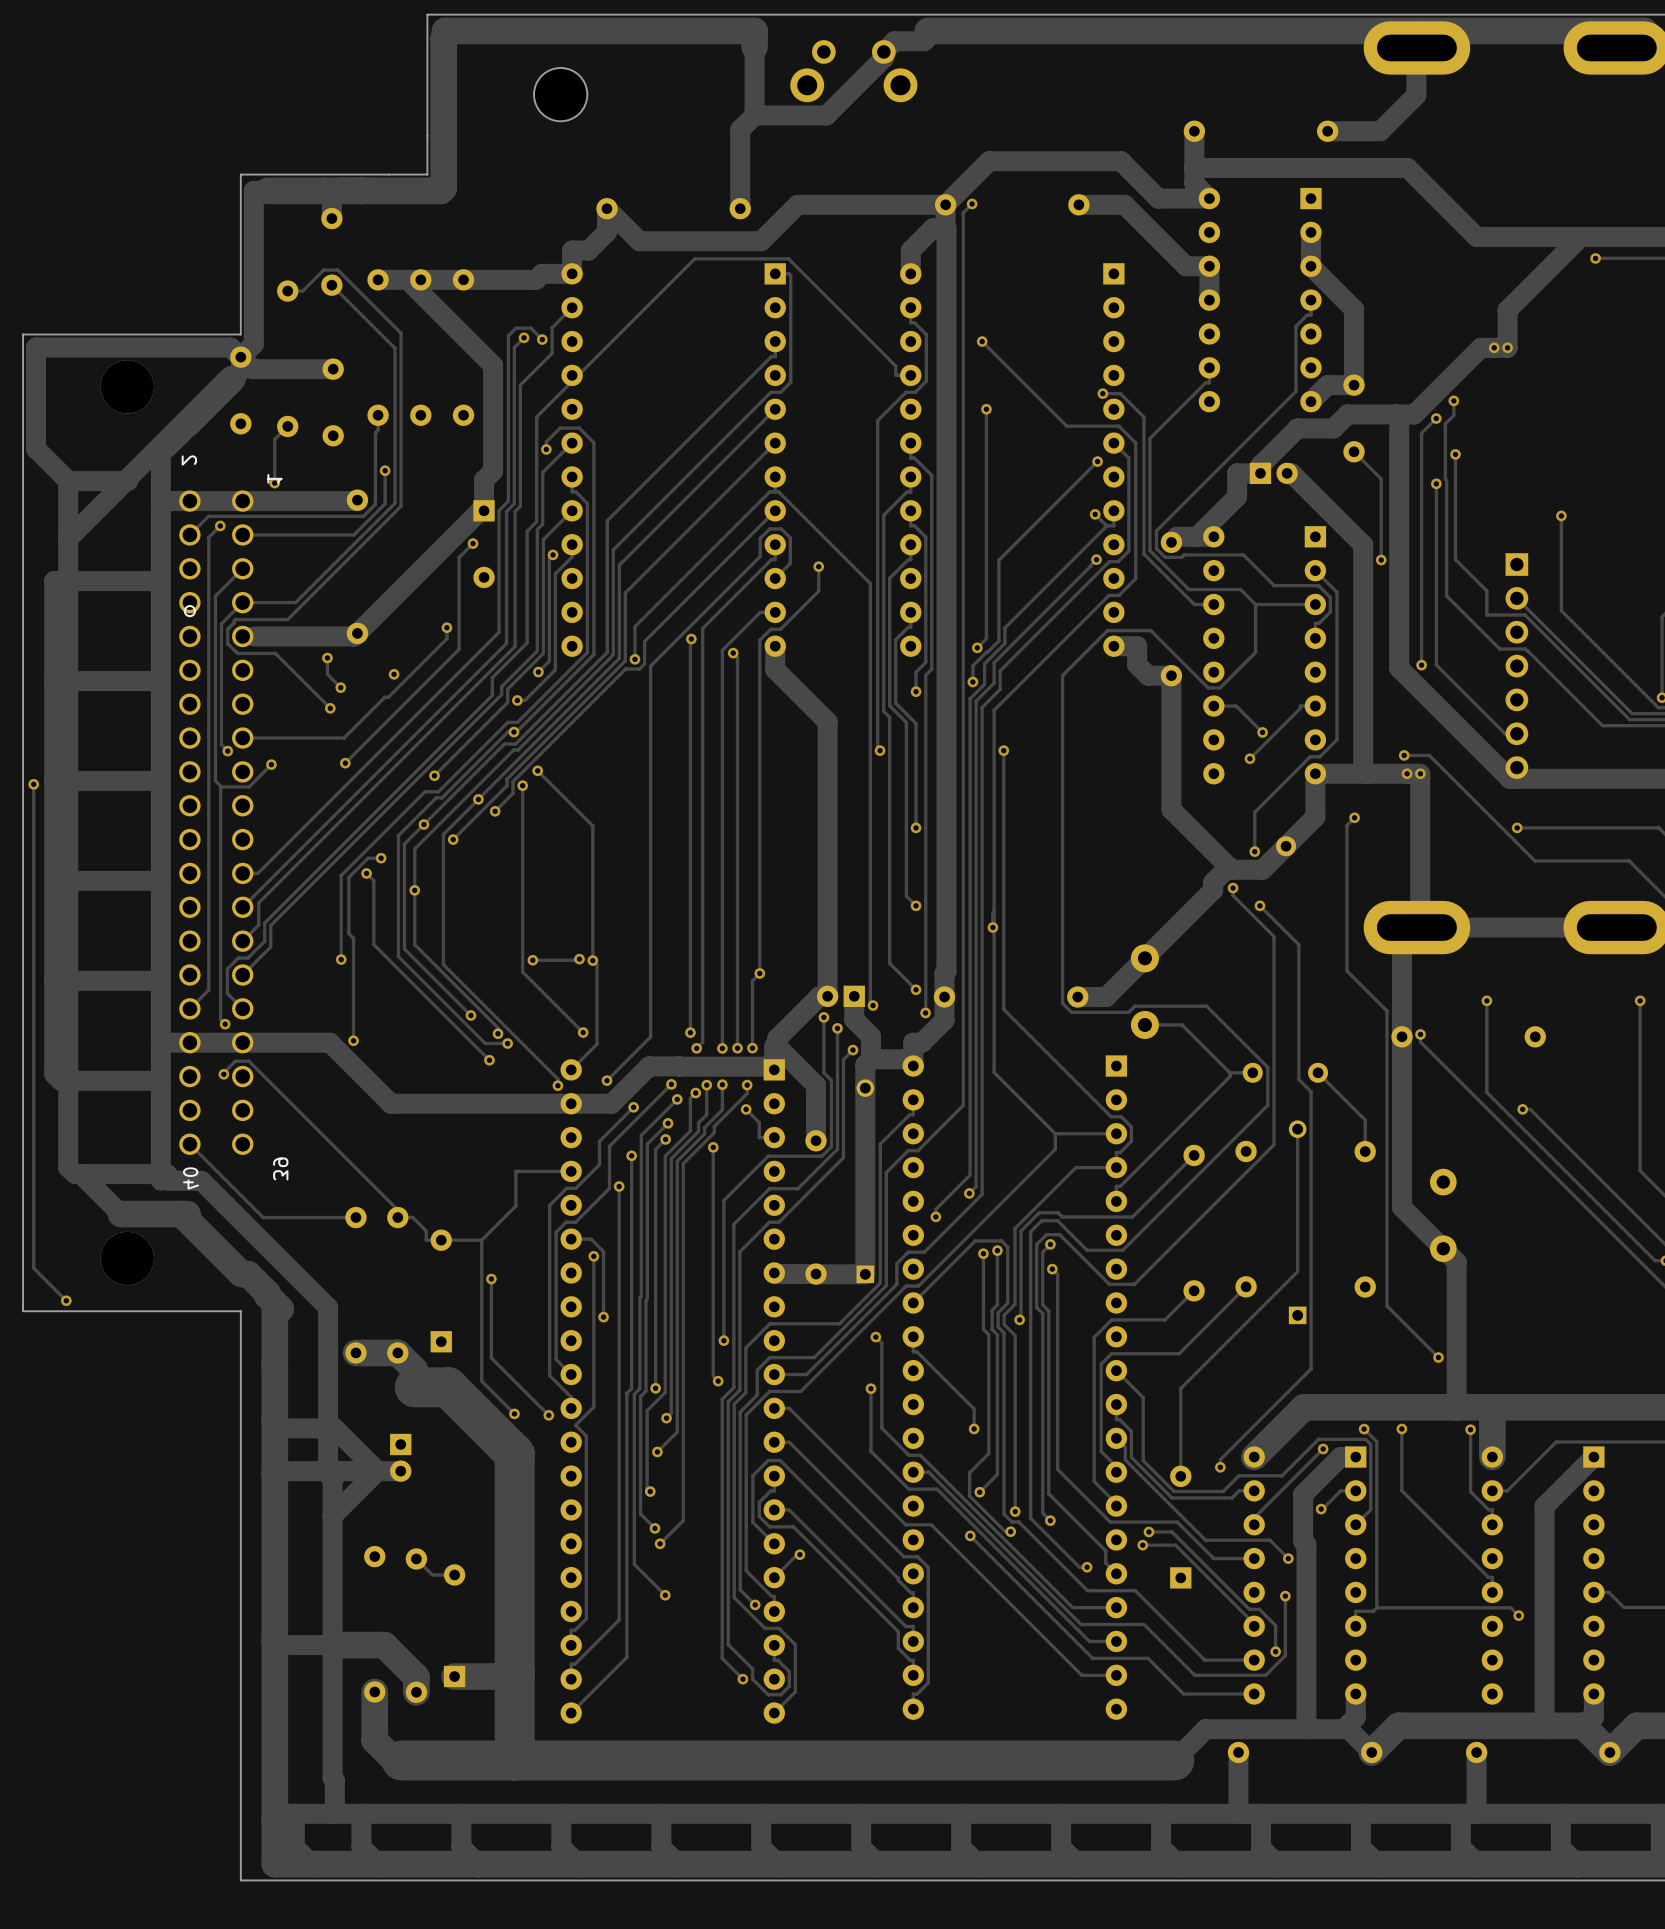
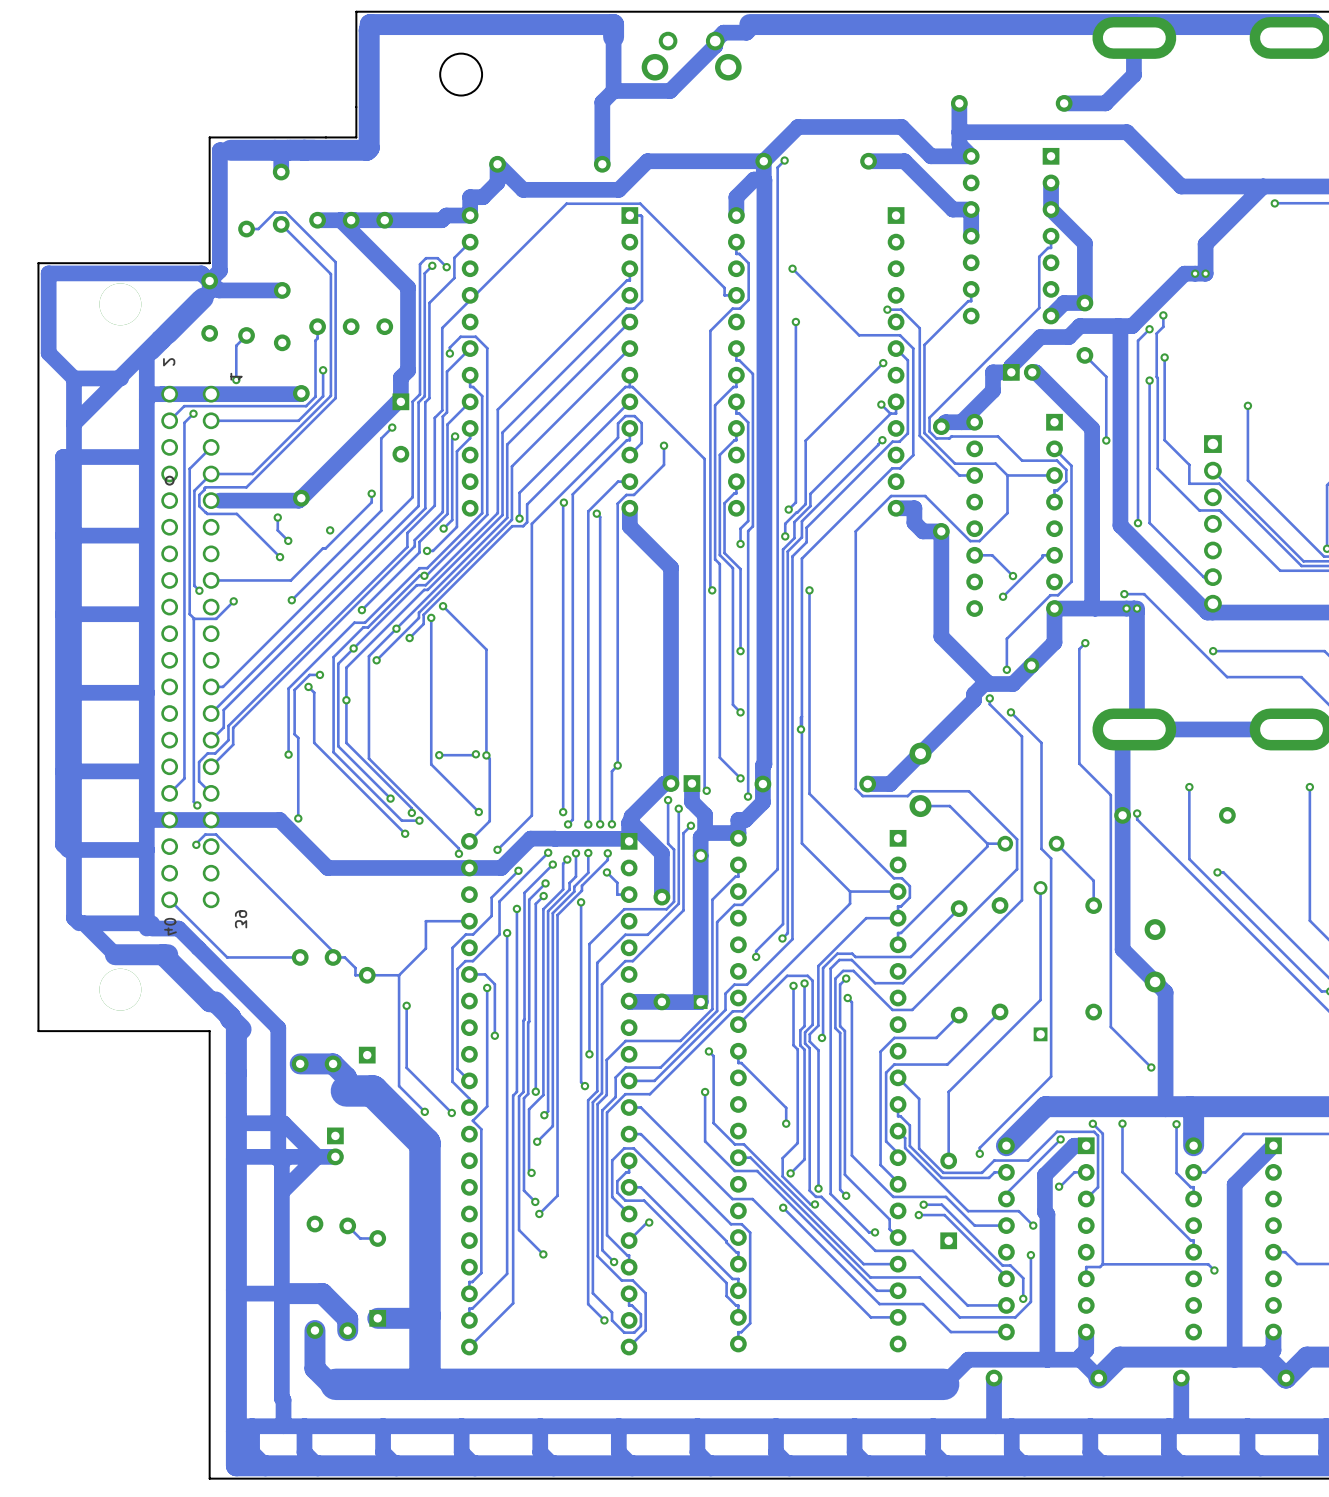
track: (33, 784) (33, 1268) (66, 1300) -> none
via: (33, 784) -> none
via: (66, 1300) -> none

